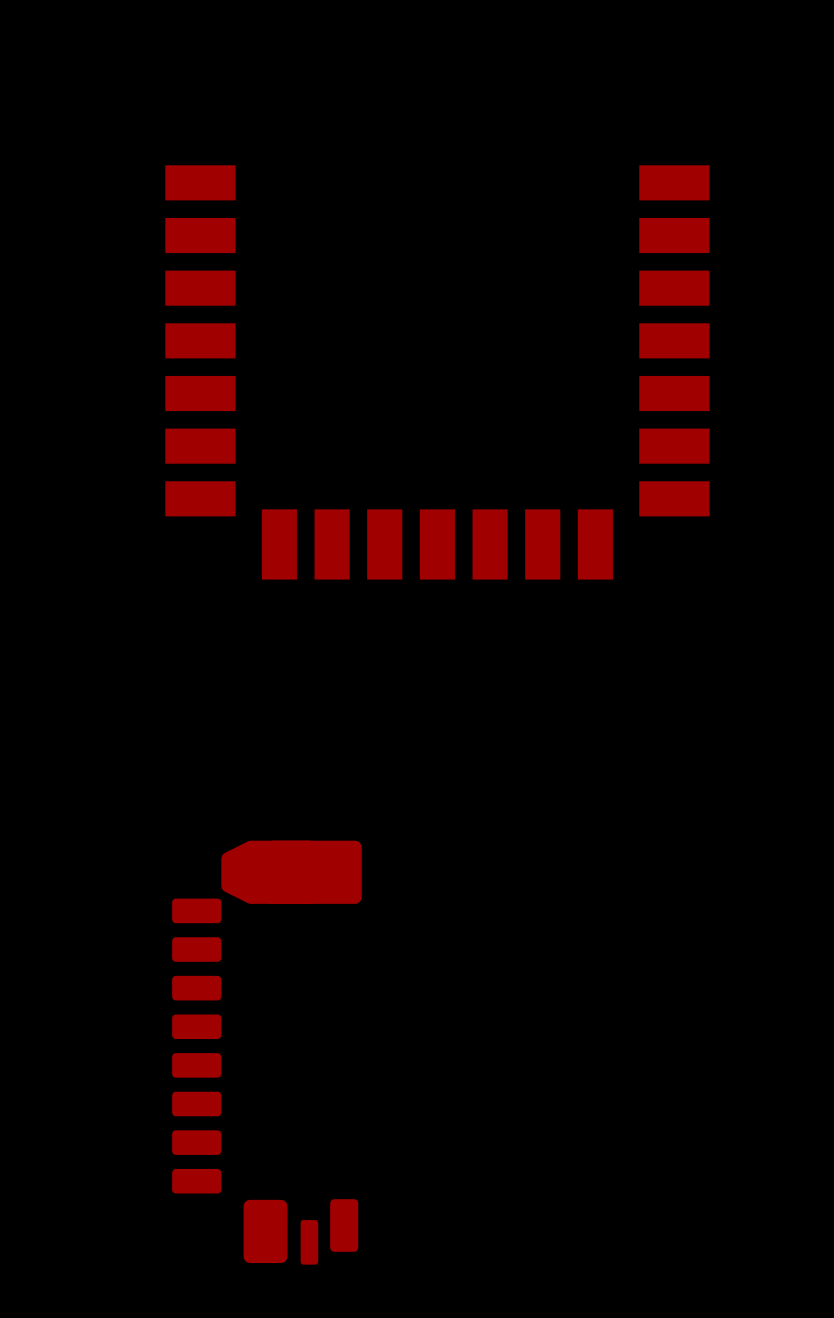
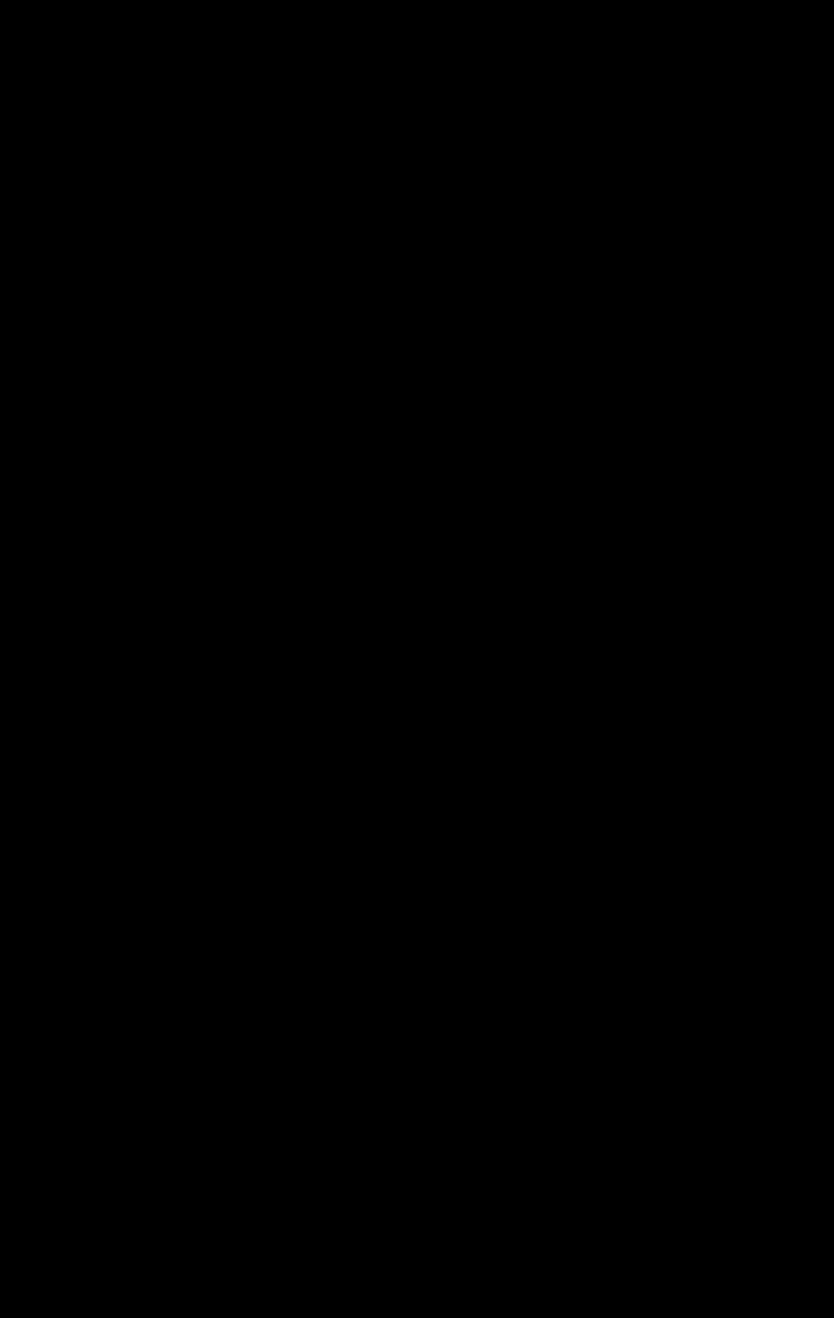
part: (437, 372) -> none
part: (266, 1052) -> none

